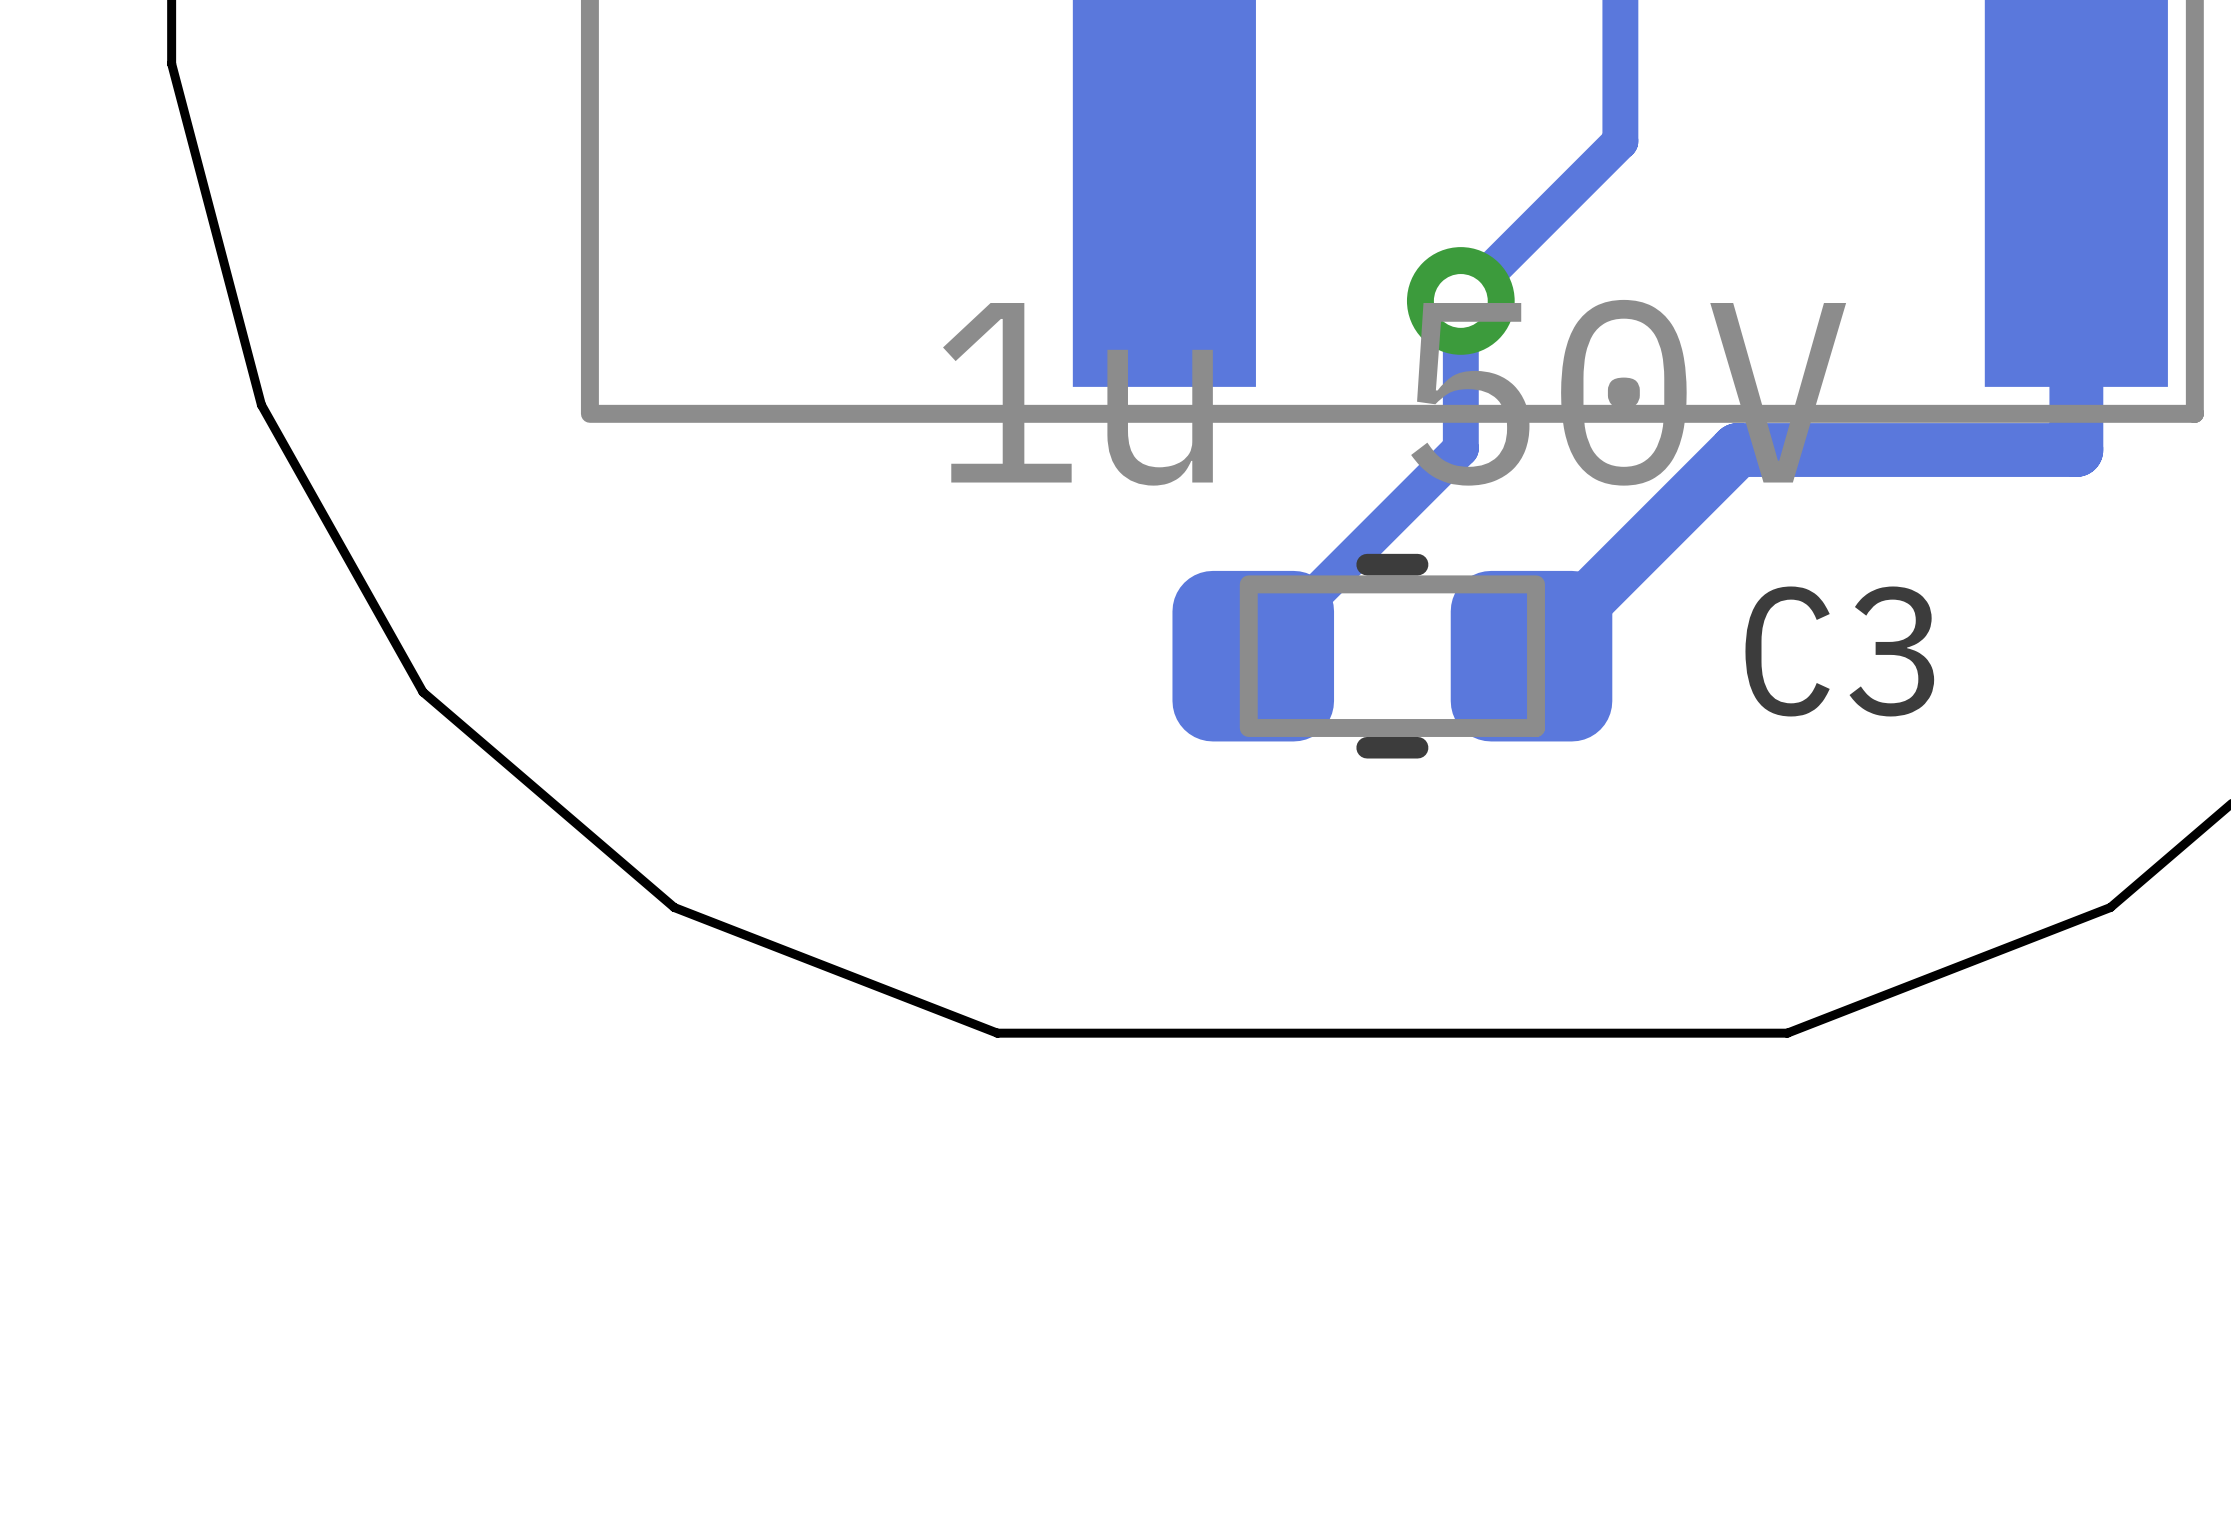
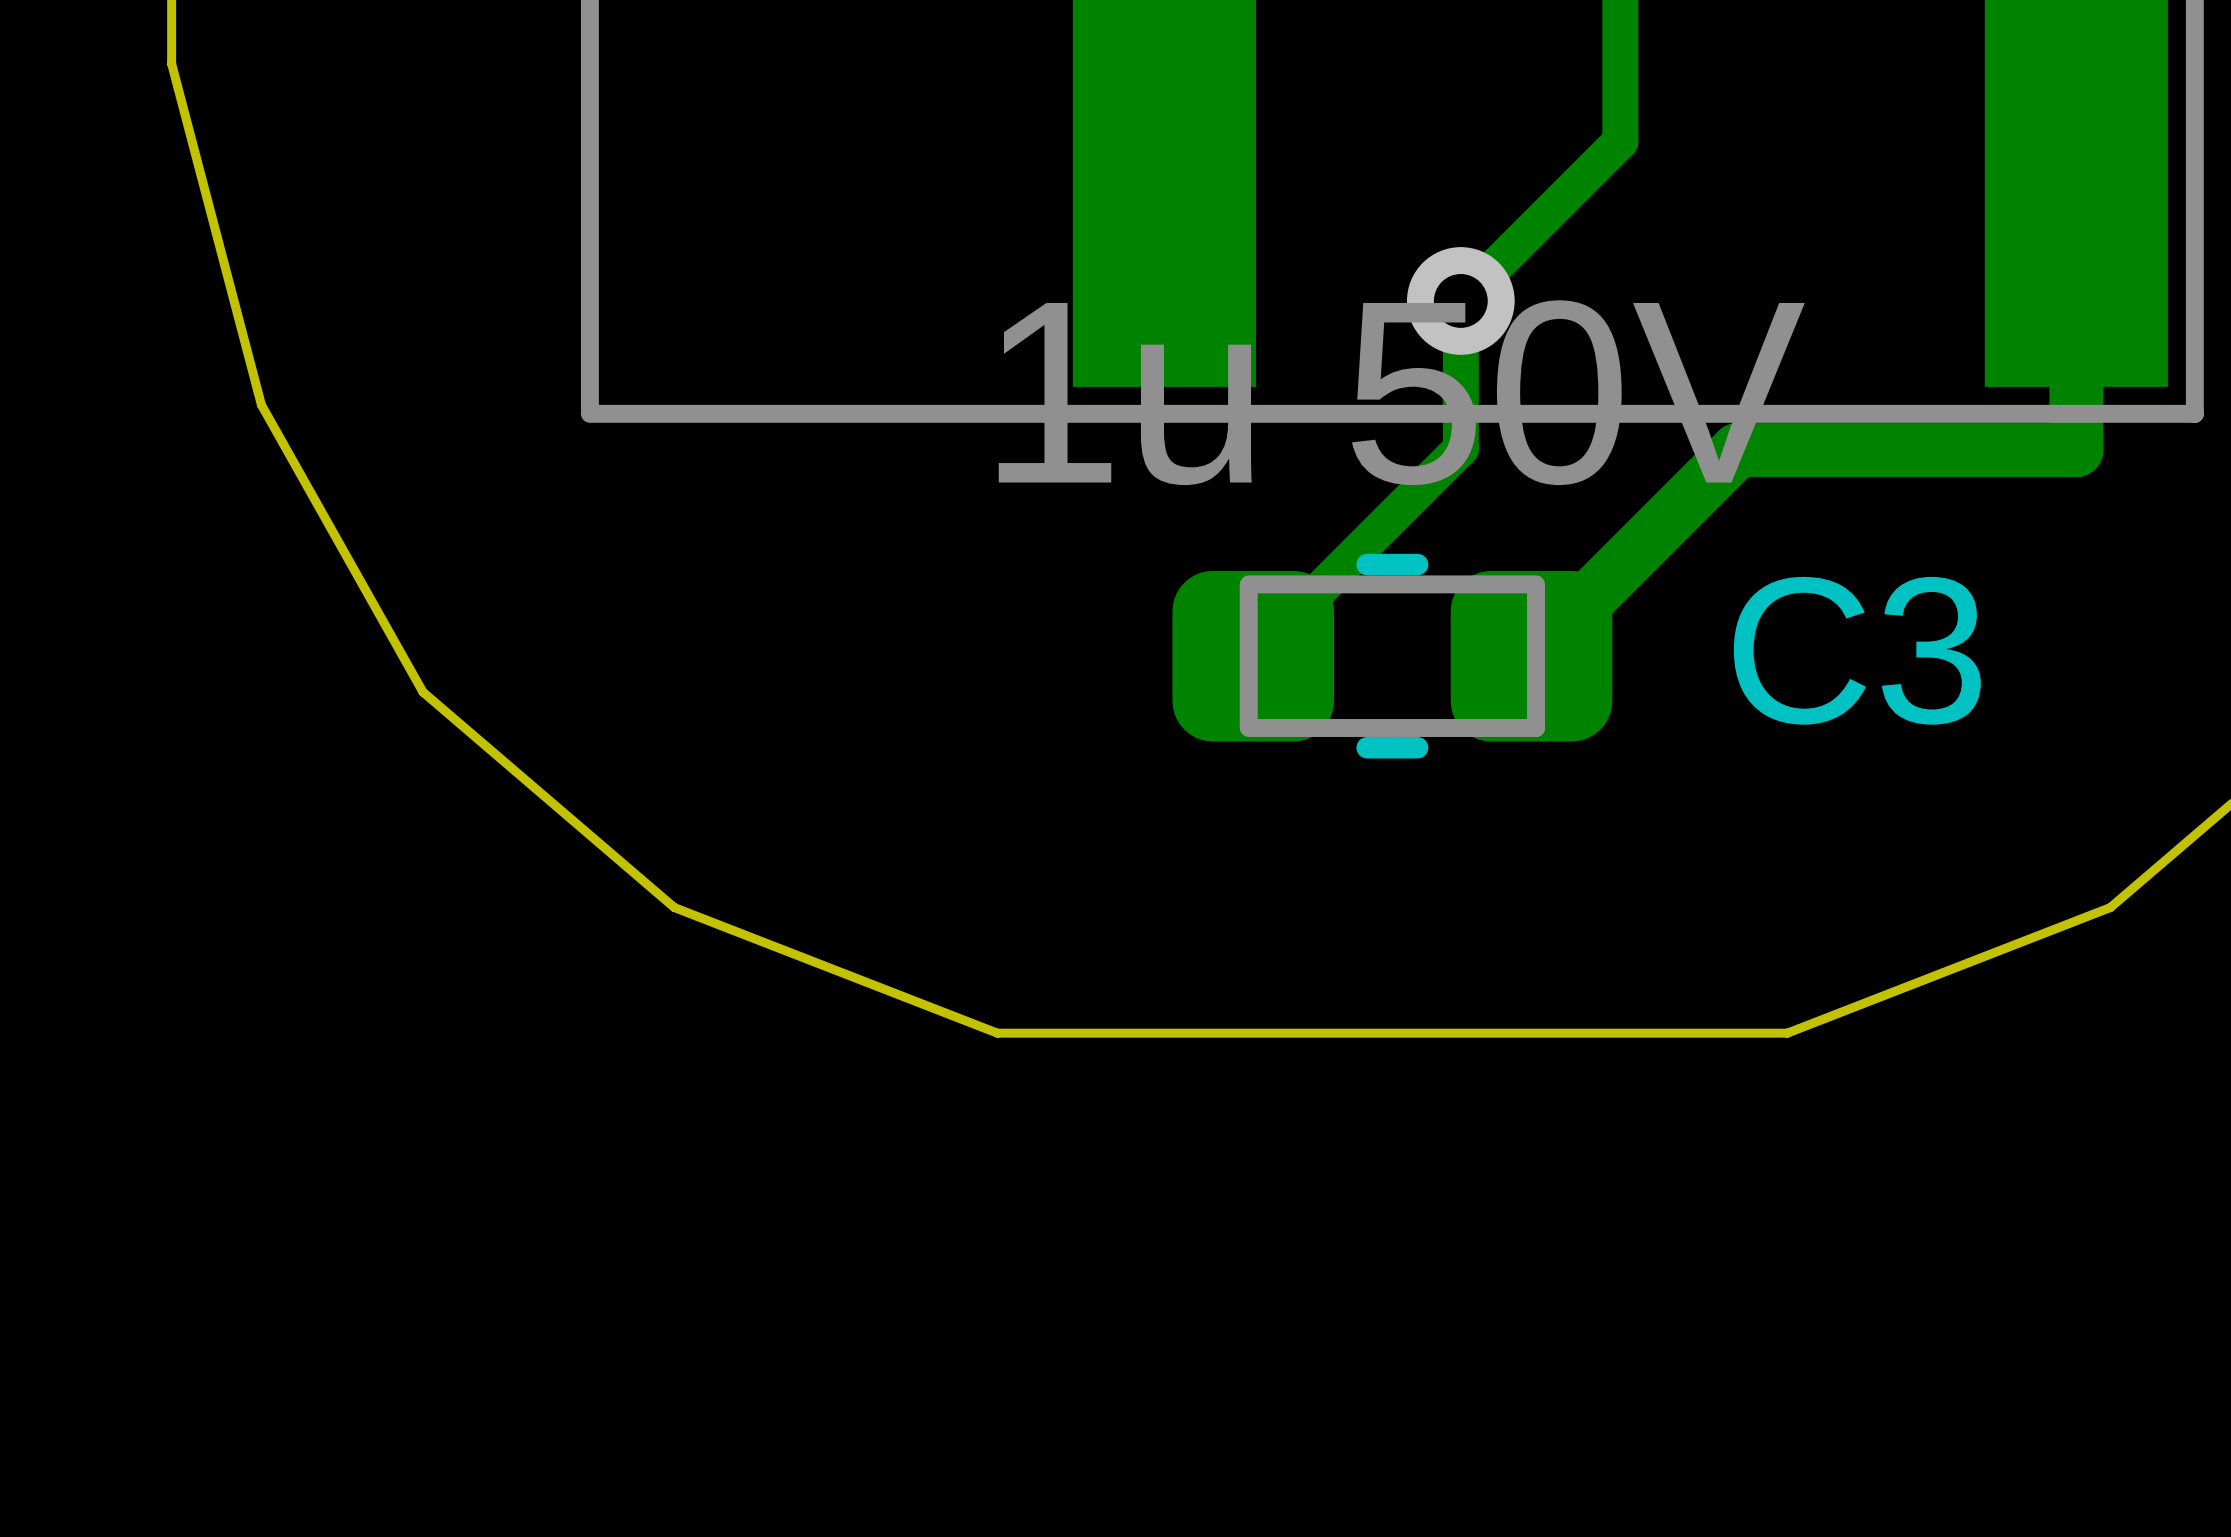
C3 name position: C3 (1839, 651) -> C3 (1857, 650)

